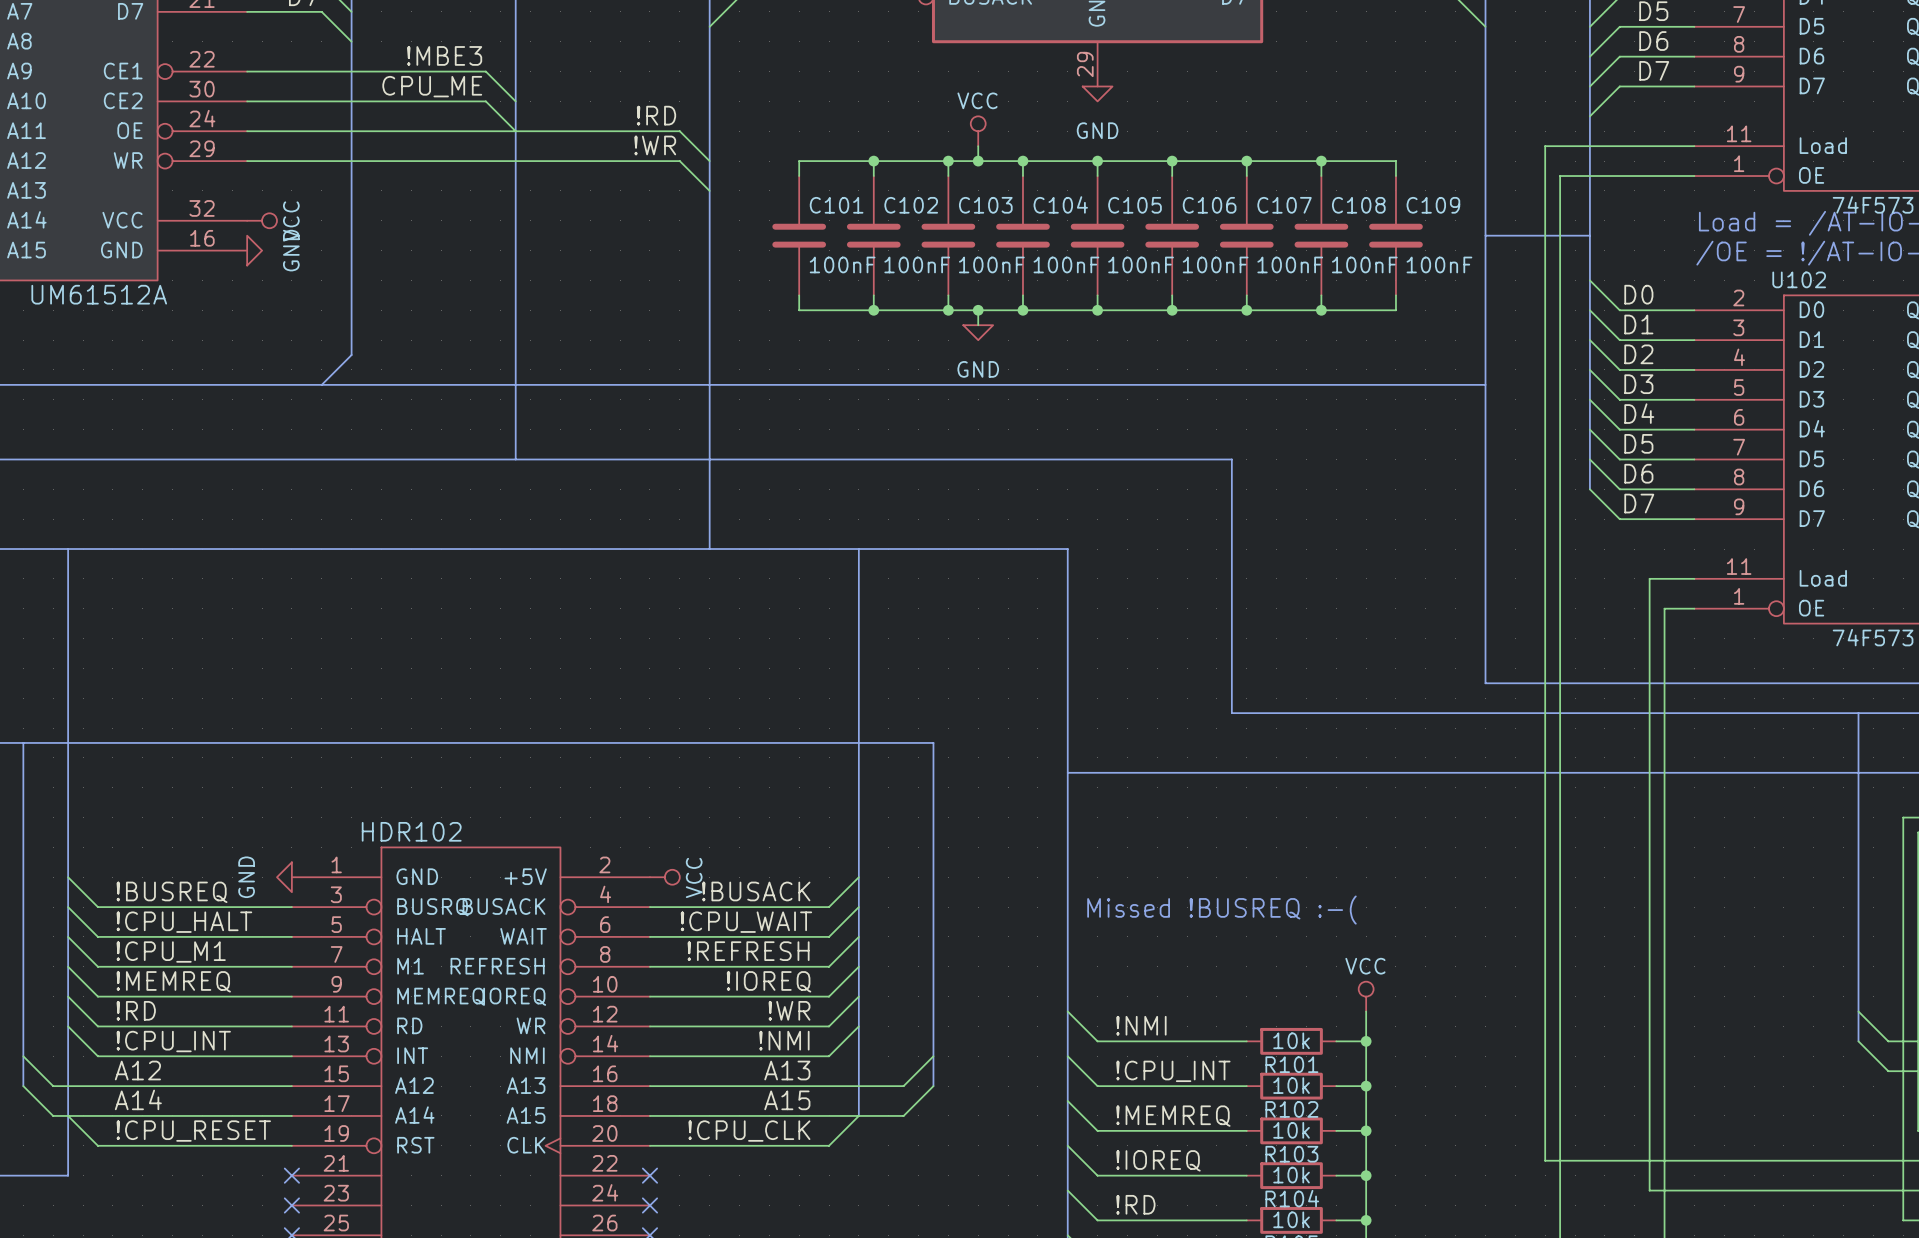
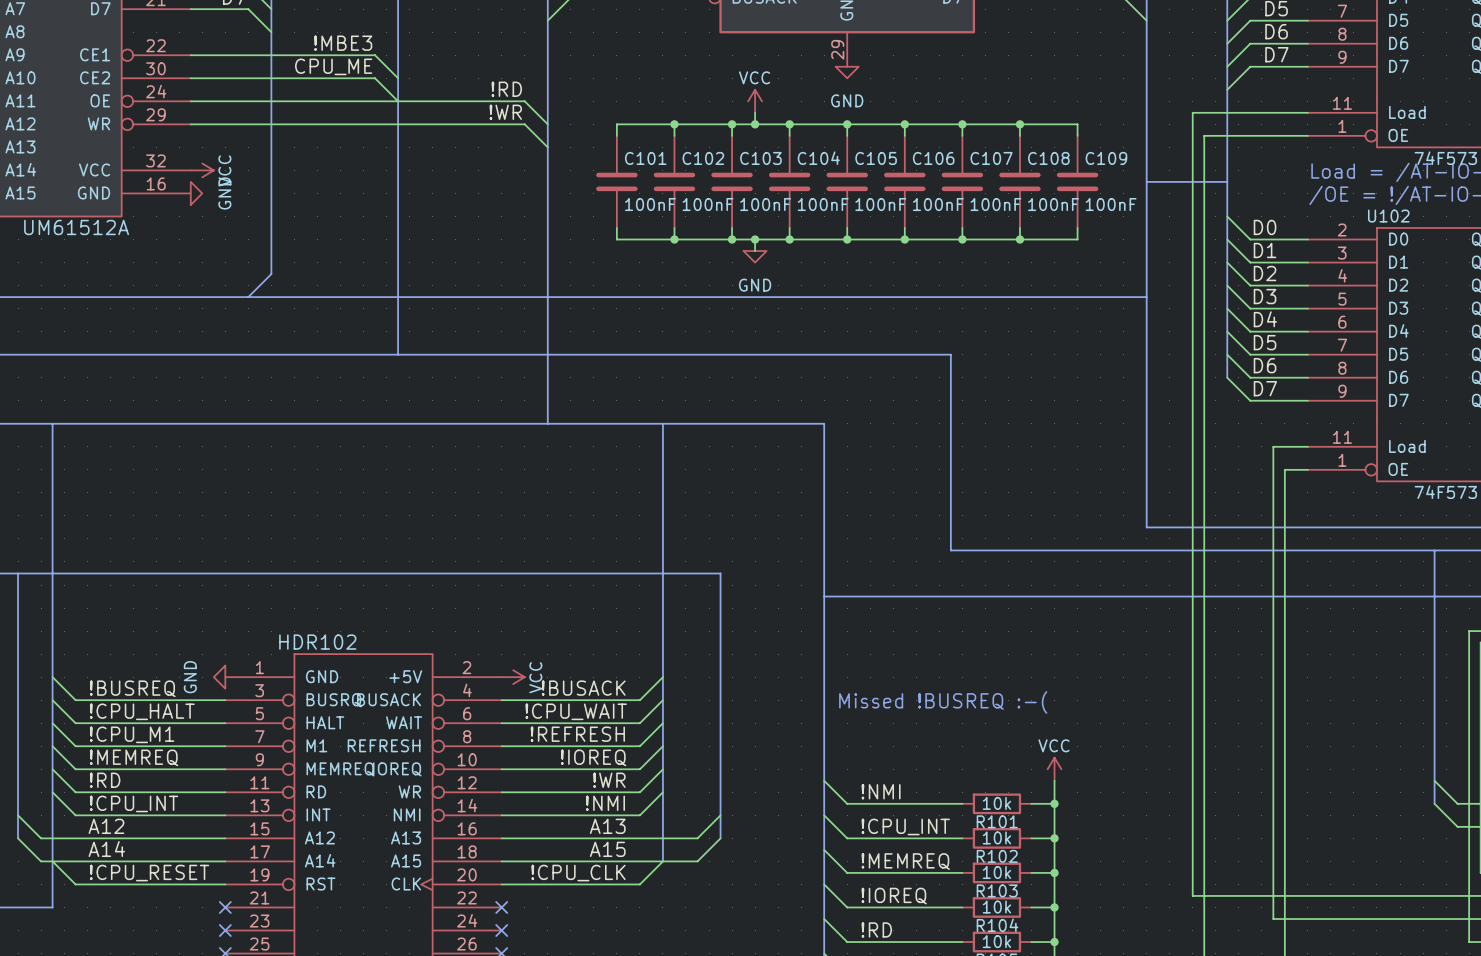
power symbol shape: [970, 116, 986, 147] -> [748, 89, 763, 113]
power symbol shape: [247, 213, 277, 229] -> [190, 163, 214, 178]
power symbol shape: [649, 869, 680, 885] -> [501, 670, 525, 685]
power symbol shape: [1358, 981, 1374, 1012] -> [1047, 757, 1062, 781]

